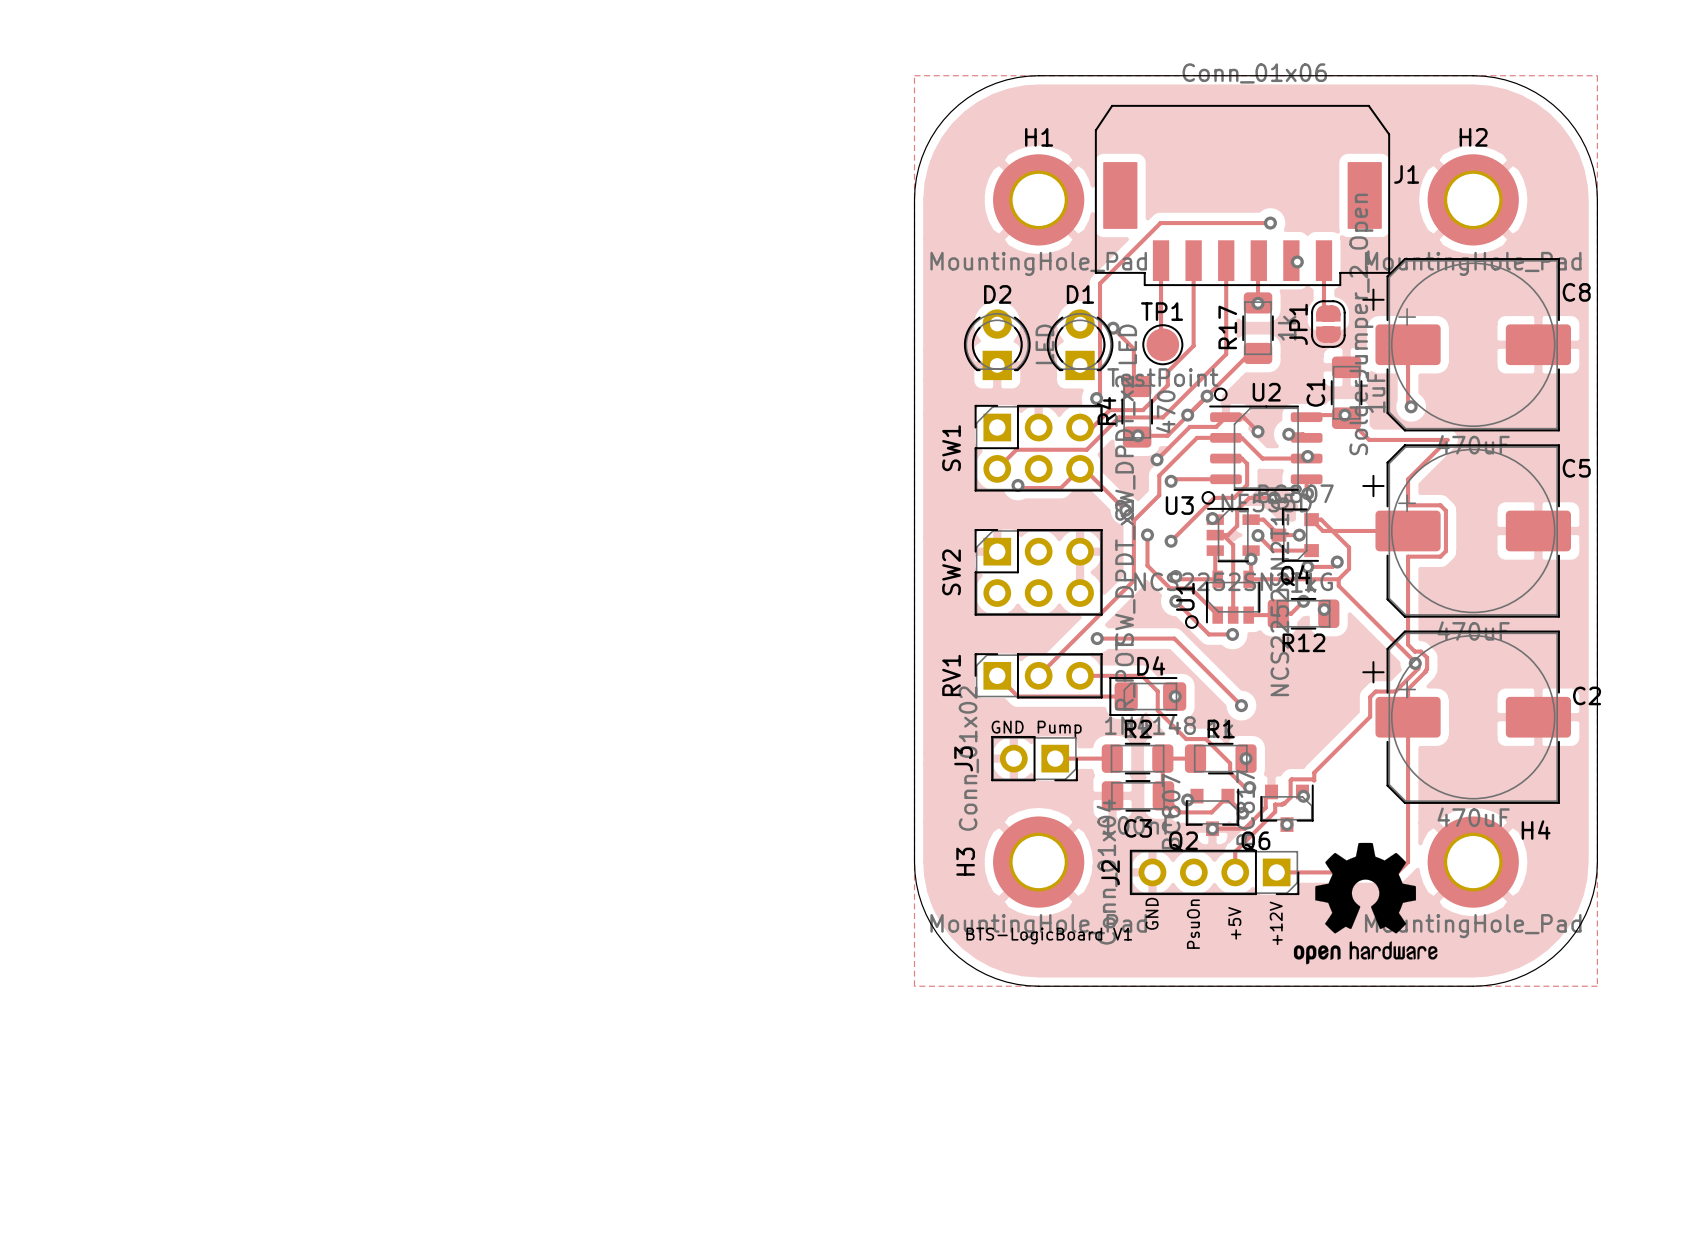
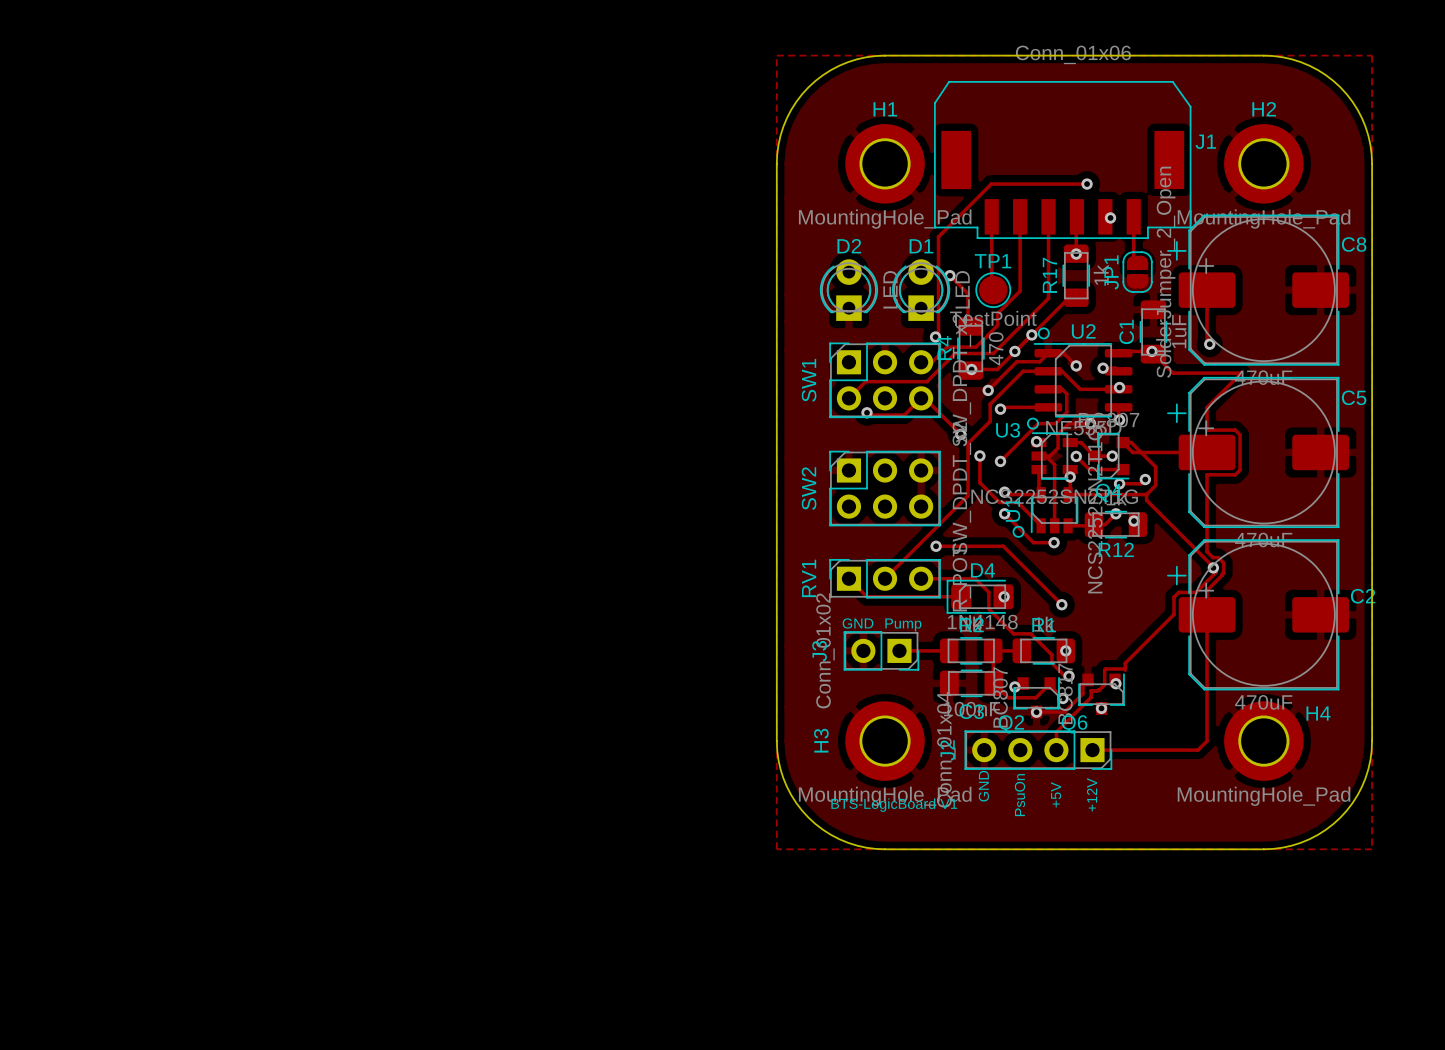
drawing: [1293, 842, 1438, 965] -> none

